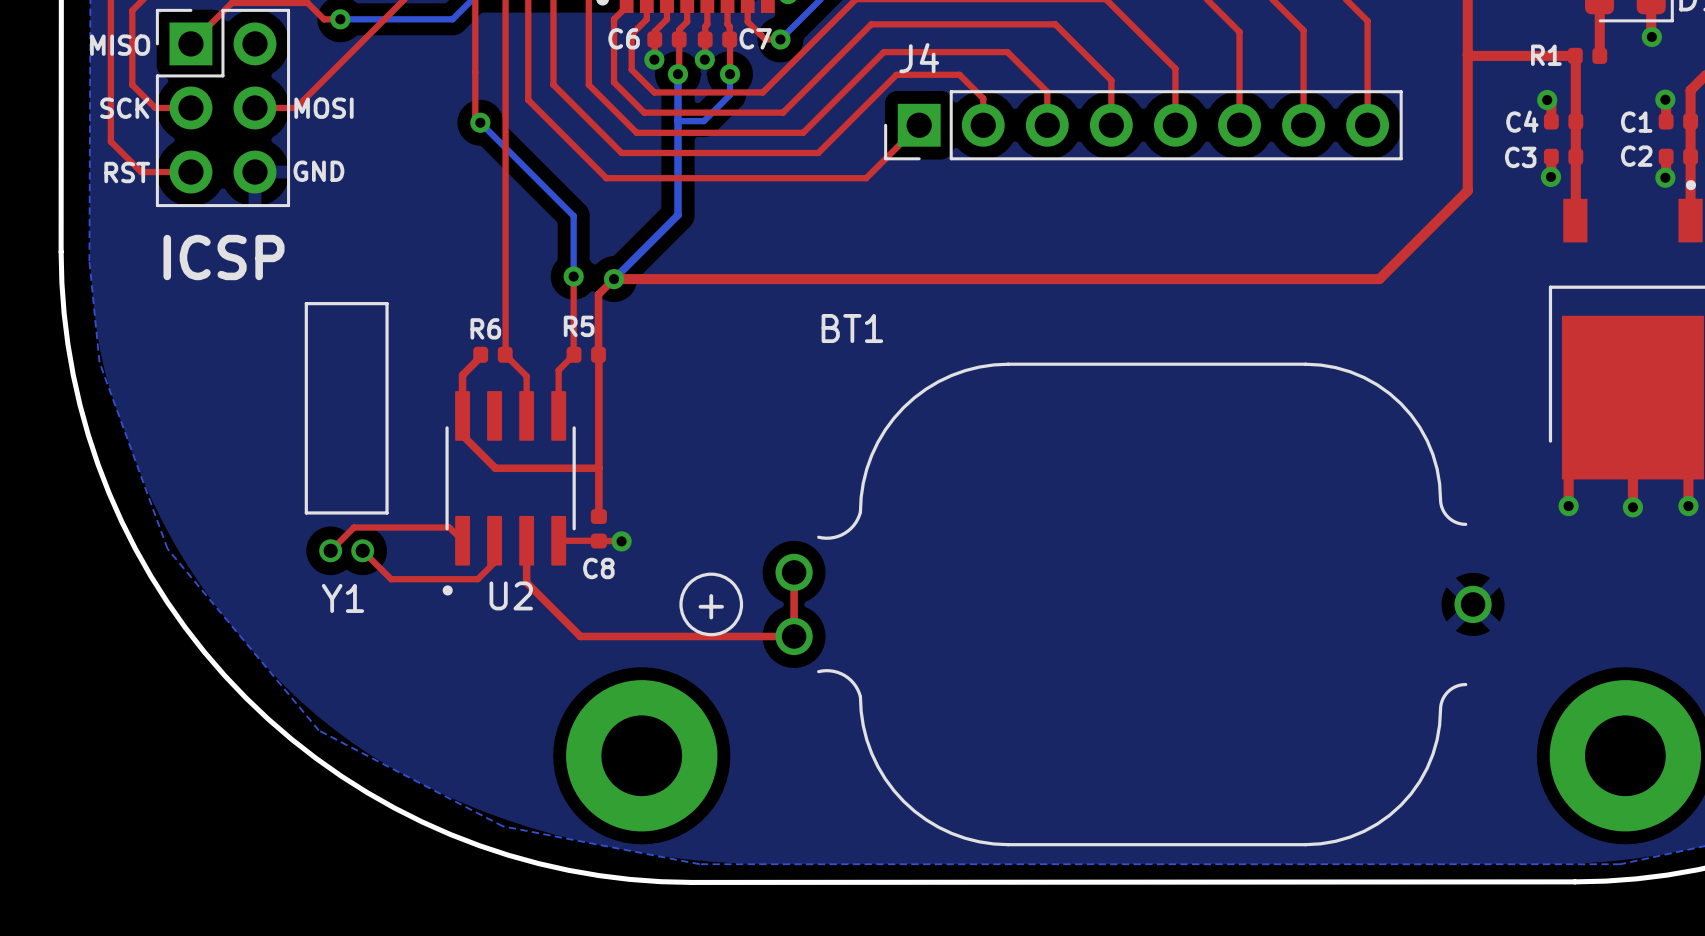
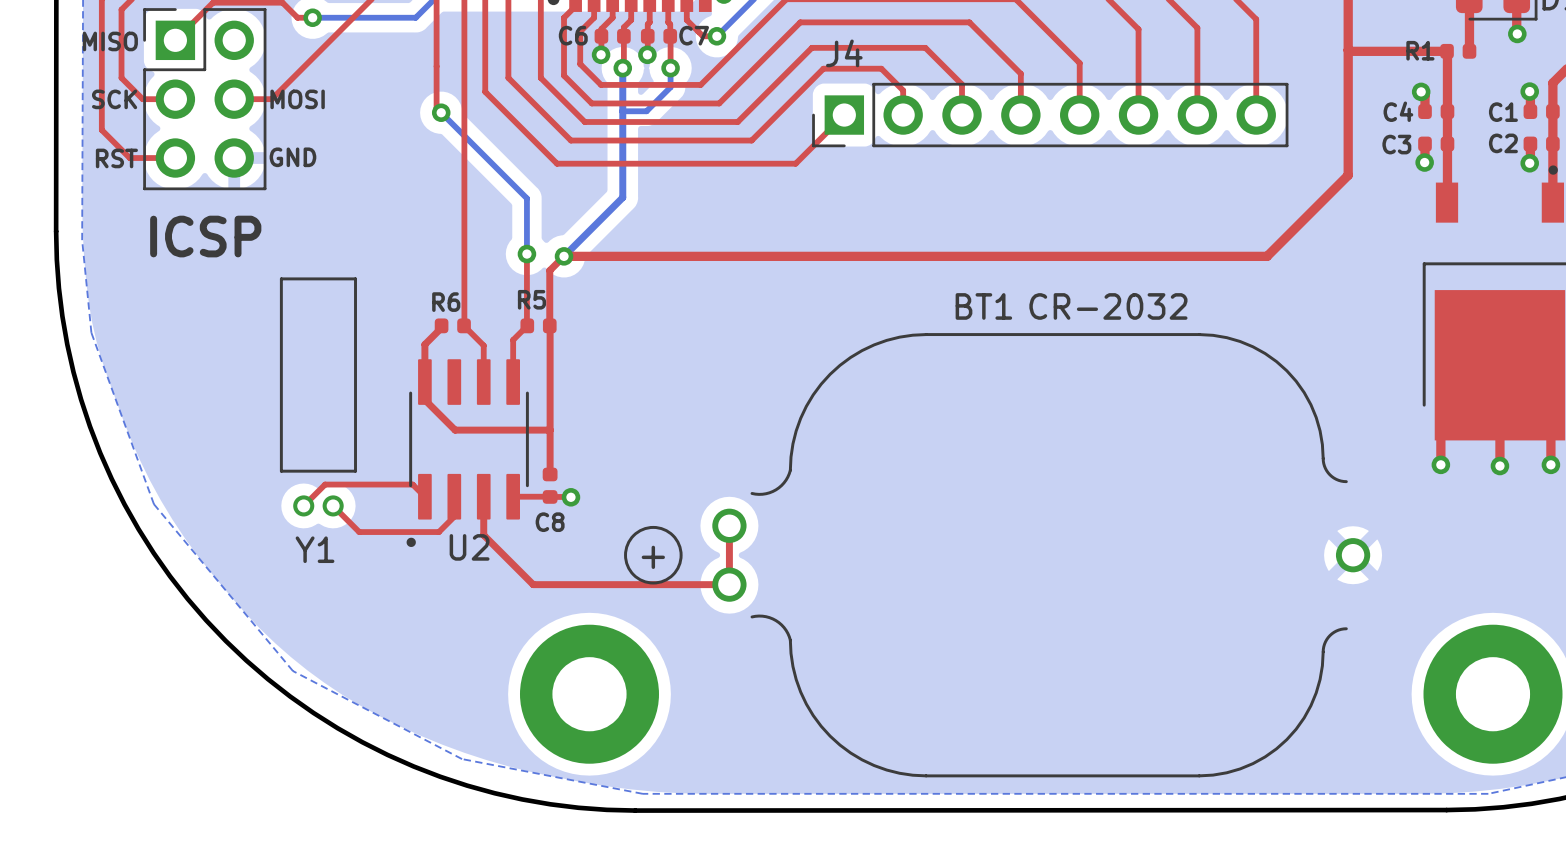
BT1 name position: BT1 (852, 328) -> BT1 (983, 306)
BT1 value: none -> CR-2032 (1108, 306)

